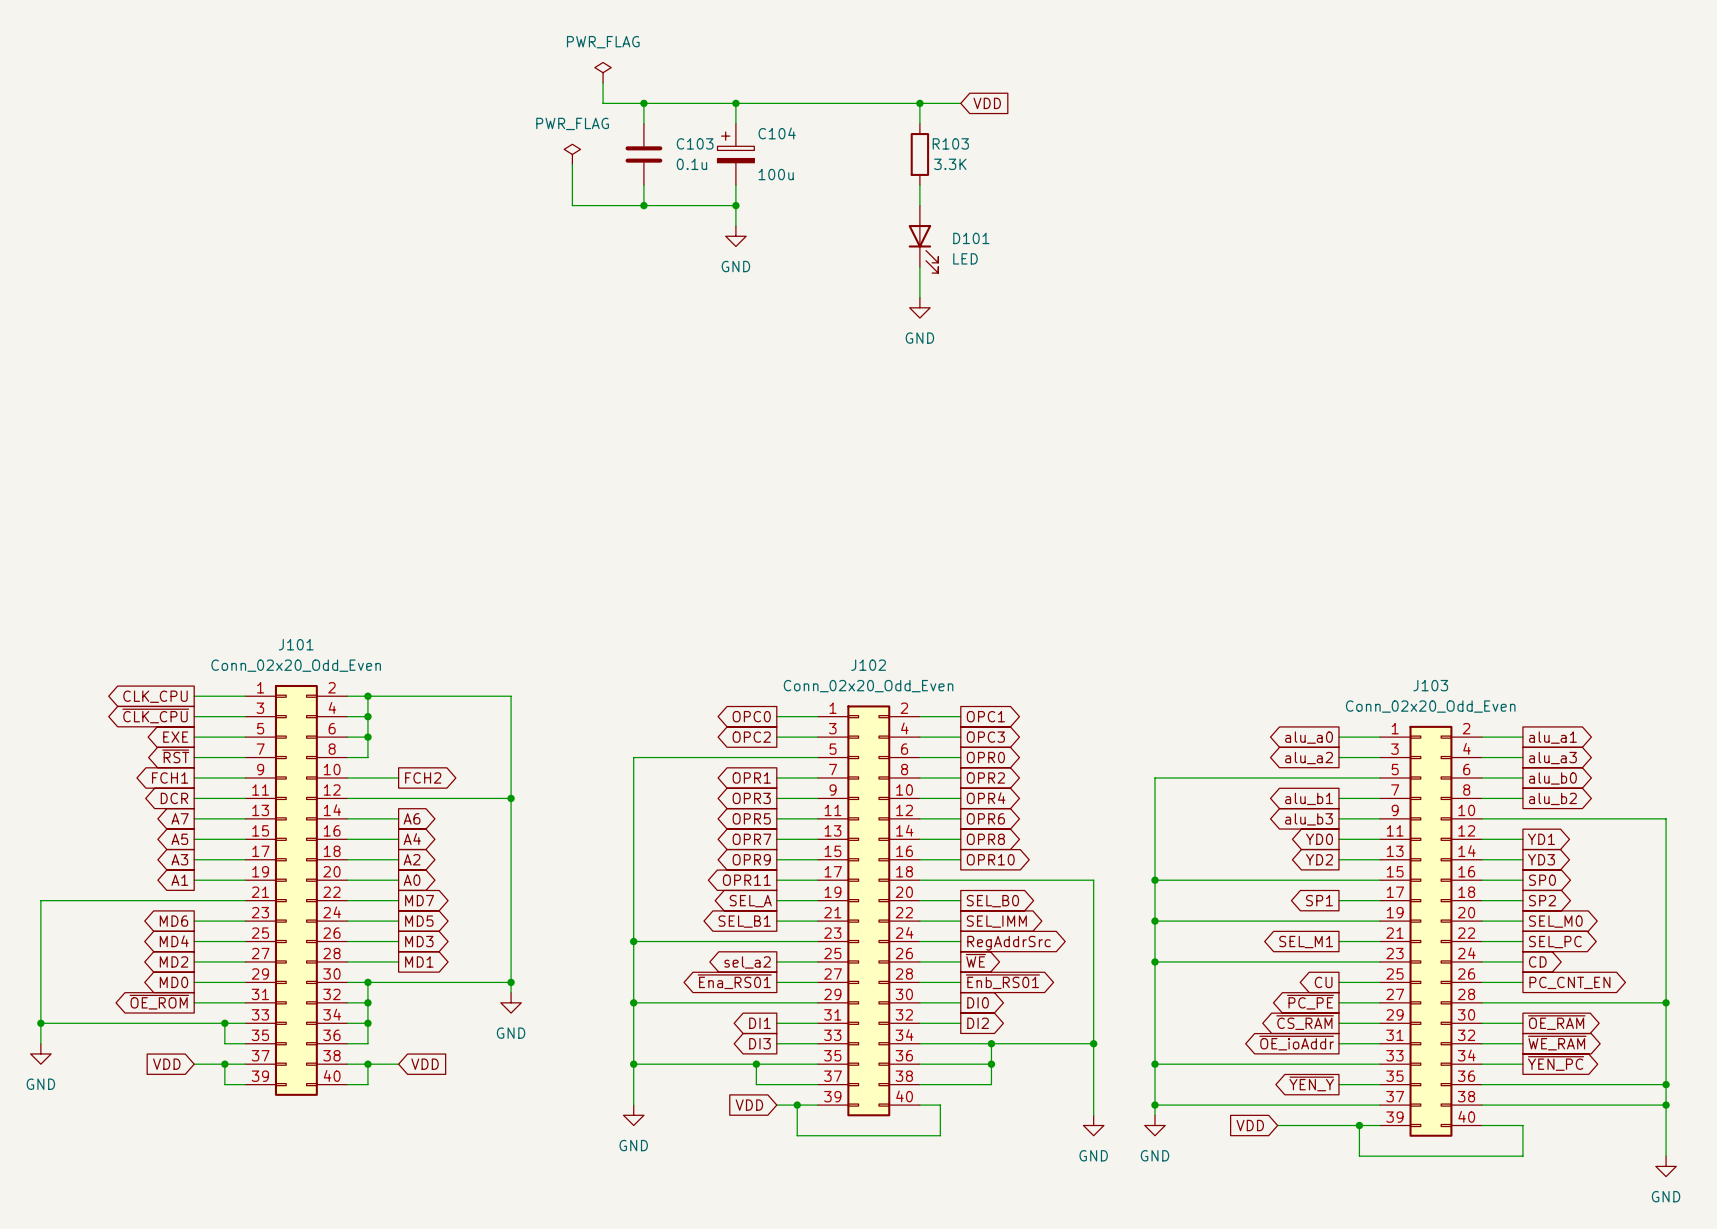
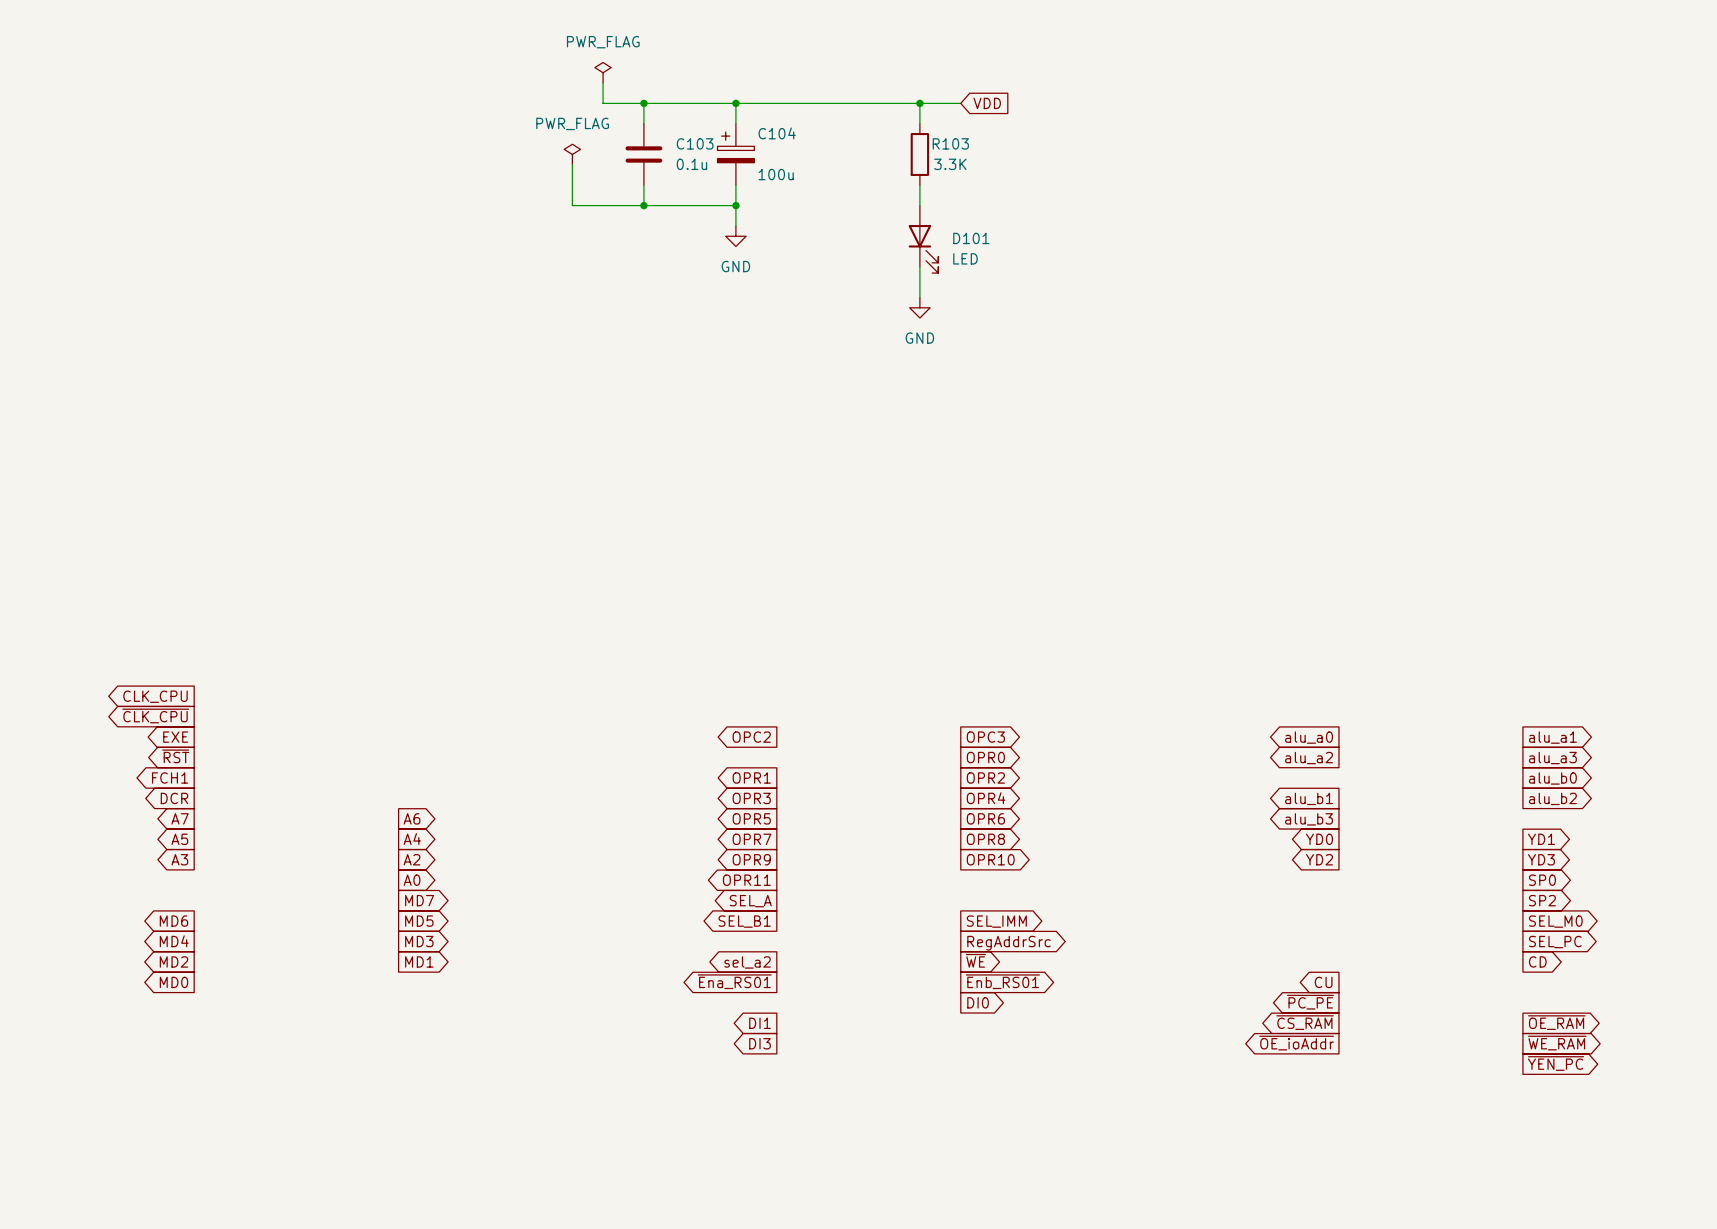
wire: (194, 696) (245, 696) -> none
wire: (347, 696) (511, 696) (511, 992) -> none
wire: (367, 696) (367, 757) (347, 757) -> none
junction: (367, 696) -> none
wire: (194, 716) (245, 716) -> none
wire: (347, 716) (367, 716) -> none
junction: (367, 716) -> none
global label: OPC0 (751, 716) -> none
wire: (776, 716) (817, 716) -> none
wire: (919, 716) (960, 716) -> none
global label: OPC1 (985, 716) -> none
wire: (194, 737) (245, 737) -> none
wire: (347, 737) (367, 737) -> none
junction: (367, 737) -> none
wire: (776, 737) (817, 737) -> none
wire: (919, 737) (960, 737) -> none
wire: (1338, 737) (1379, 737) -> none
wire: (1482, 737) (1522, 737) -> none
wire: (194, 757) (245, 757) -> none
wire: (817, 757) (633, 757) (633, 1105) -> none
wire: (919, 757) (960, 757) -> none
wire: (1338, 757) (1379, 757) -> none
wire: (1482, 757) (1522, 757) -> none
wire: (194, 777) (245, 777) -> none
wire: (347, 777) (398, 777) -> none
global label: FCH2 (423, 777) -> none
wire: (776, 777) (817, 777) -> none
wire: (919, 777) (960, 777) -> none
wire: (1379, 777) (1154, 777) (1154, 1115) -> none
wire: (1482, 777) (1522, 777) -> none
wire: (194, 798) (245, 798) -> none
wire: (347, 798) (511, 798) -> none
junction: (511, 798) -> none
wire: (776, 798) (817, 798) -> none
wire: (919, 798) (960, 798) -> none
wire: (1338, 798) (1379, 798) -> none
wire: (1482, 798) (1522, 798) -> none
wire: (194, 818) (245, 818) -> none
wire: (347, 818) (398, 818) -> none
wire: (776, 818) (817, 818) -> none
wire: (919, 818) (960, 818) -> none
wire: (1338, 818) (1379, 818) -> none
wire: (1482, 818) (1666, 818) (1666, 1156) -> none
wire: (194, 839) (245, 839) -> none
wire: (347, 839) (398, 839) -> none
wire: (776, 839) (817, 839) -> none
wire: (919, 839) (960, 839) -> none
wire: (1338, 839) (1379, 839) -> none
wire: (1482, 839) (1522, 839) -> none
wire: (194, 859) (245, 859) -> none
wire: (347, 859) (398, 859) -> none
wire: (776, 859) (817, 859) -> none
wire: (919, 859) (960, 859) -> none
wire: (1338, 859) (1379, 859) -> none
wire: (1482, 859) (1522, 859) -> none
global label: A1 (179, 880) -> none
wire: (194, 880) (245, 880) -> none
wire: (347, 880) (398, 880) -> none
wire: (776, 880) (817, 880) -> none
wire: (919, 880) (1093, 880) (1093, 1115) -> none
wire: (1154, 880) (1379, 880) -> none
junction: (1154, 880) -> none
wire: (1482, 880) (1522, 880) -> none
J101: Conn_02x20_Odd_Even (296, 890) -> none
wire: (245, 900) (40, 900) (40, 1043) -> none
wire: (347, 900) (398, 900) -> none
wire: (776, 900) (817, 900) -> none
wire: (919, 900) (960, 900) -> none
global label: SP1 (1319, 900) -> none
wire: (1338, 900) (1379, 900) -> none
wire: (1482, 900) (1522, 900) -> none
global label: SEL_B0 (992, 901) -> none
J102: Conn_02x20_Odd_Even (868, 910) -> none
wire: (194, 921) (245, 921) -> none
wire: (347, 921) (398, 921) -> none
wire: (776, 921) (817, 921) -> none
wire: (919, 921) (960, 921) -> none
wire: (1154, 921) (1379, 921) -> none
junction: (1154, 921) -> none
wire: (1482, 921) (1522, 921) -> none
J103: Conn_02x20_Odd_Even (1430, 931) -> none
wire: (194, 941) (245, 941) -> none
wire: (347, 941) (398, 941) -> none
wire: (633, 941) (817, 941) -> none
junction: (633, 941) -> none
wire: (919, 941) (960, 941) -> none
wire: (1338, 941) (1379, 941) -> none
wire: (1482, 941) (1522, 941) -> none
global label: SEL_M1 (1306, 942) -> none
wire: (194, 961) (245, 961) -> none
wire: (347, 961) (398, 961) -> none
wire: (776, 961) (817, 961) -> none
wire: (919, 961) (960, 961) -> none
wire: (1154, 961) (1379, 961) -> none
junction: (1154, 961) -> none
wire: (1482, 961) (1522, 961) -> none
wire: (194, 982) (245, 982) -> none
wire: (347, 982) (511, 982) -> none
wire: (367, 982) (367, 1043) (347, 1043) -> none
junction: (367, 982) -> none
junction: (511, 982) -> none
wire: (776, 982) (817, 982) -> none
wire: (919, 982) (960, 982) -> none
wire: (1338, 982) (1379, 982) -> none
wire: (1482, 982) (1522, 982) -> none
global label: PC_CNT_EN (1569, 982) -> none
global label: ~{OE_ROM} (159, 1002) -> none
wire: (194, 1002) (245, 1002) -> none
wire: (347, 1002) (367, 1002) -> none
junction: (367, 1002) -> none
power symbol: GND (511, 1002) -> none
wire: (633, 1002) (817, 1002) -> none
junction: (633, 1002) -> none
wire: (919, 1002) (960, 1002) -> none
wire: (1338, 1002) (1379, 1002) -> none
wire: (1482, 1002) (1666, 1002) -> none
junction: (1666, 1002) -> none
wire: (40, 1023) (245, 1023) -> none
junction: (40, 1023) -> none
wire: (224, 1023) (224, 1043) (245, 1043) -> none
junction: (224, 1023) -> none
wire: (347, 1023) (367, 1023) -> none
junction: (367, 1023) -> none
wire: (776, 1023) (817, 1023) -> none
wire: (919, 1023) (960, 1023) -> none
global label: DI2 (978, 1023) -> none
wire: (1338, 1023) (1379, 1023) -> none
wire: (1482, 1023) (1522, 1023) -> none
wire: (776, 1043) (817, 1043) -> none
wire: (919, 1043) (1093, 1043) -> none
wire: (991, 1043) (991, 1084) (919, 1084) -> none
junction: (991, 1043) -> none
junction: (1093, 1043) -> none
wire: (1338, 1043) (1379, 1043) -> none
wire: (1482, 1043) (1522, 1043) -> none
power symbol: GND (40, 1053) -> none
global label: VDD (166, 1064) -> none
wire: (194, 1064) (245, 1064) -> none
wire: (224, 1064) (224, 1084) (245, 1084) -> none
junction: (224, 1064) -> none
wire: (347, 1064) (398, 1064) -> none
wire: (367, 1064) (367, 1084) (347, 1084) -> none
junction: (367, 1064) -> none
global label: VDD (425, 1064) -> none
wire: (633, 1064) (817, 1064) -> none
junction: (633, 1064) -> none
wire: (756, 1064) (756, 1084) (817, 1084) -> none
junction: (756, 1064) -> none
wire: (919, 1064) (991, 1064) -> none
junction: (991, 1064) -> none
wire: (1154, 1064) (1379, 1064) -> none
junction: (1154, 1064) -> none
wire: (1482, 1064) (1522, 1064) -> none
global label: ~{YEN_Y} (1311, 1083) -> none
wire: (1338, 1084) (1379, 1084) -> none
wire: (1482, 1084) (1666, 1084) -> none
junction: (1666, 1084) -> none
global label: VDD (749, 1105) -> none
wire: (776, 1105) (817, 1105) -> none
wire: (797, 1105) (797, 1135) (940, 1135) (940, 1105) (919, 1105) -> none
junction: (797, 1105) -> none
wire: (1154, 1105) (1379, 1105) -> none
junction: (1154, 1105) -> none
wire: (1482, 1105) (1666, 1105) -> none
junction: (1666, 1105) -> none
power symbol: GND (633, 1115) -> none
power symbol: GND (1093, 1125) -> none
power symbol: GND (1154, 1125) -> none
global label: VDD (1250, 1125) -> none
wire: (1277, 1125) (1379, 1125) -> none
wire: (1359, 1125) (1359, 1156) (1522, 1156) (1522, 1125) (1482, 1125) -> none
junction: (1359, 1125) -> none
power symbol: GND (1666, 1166) -> none

